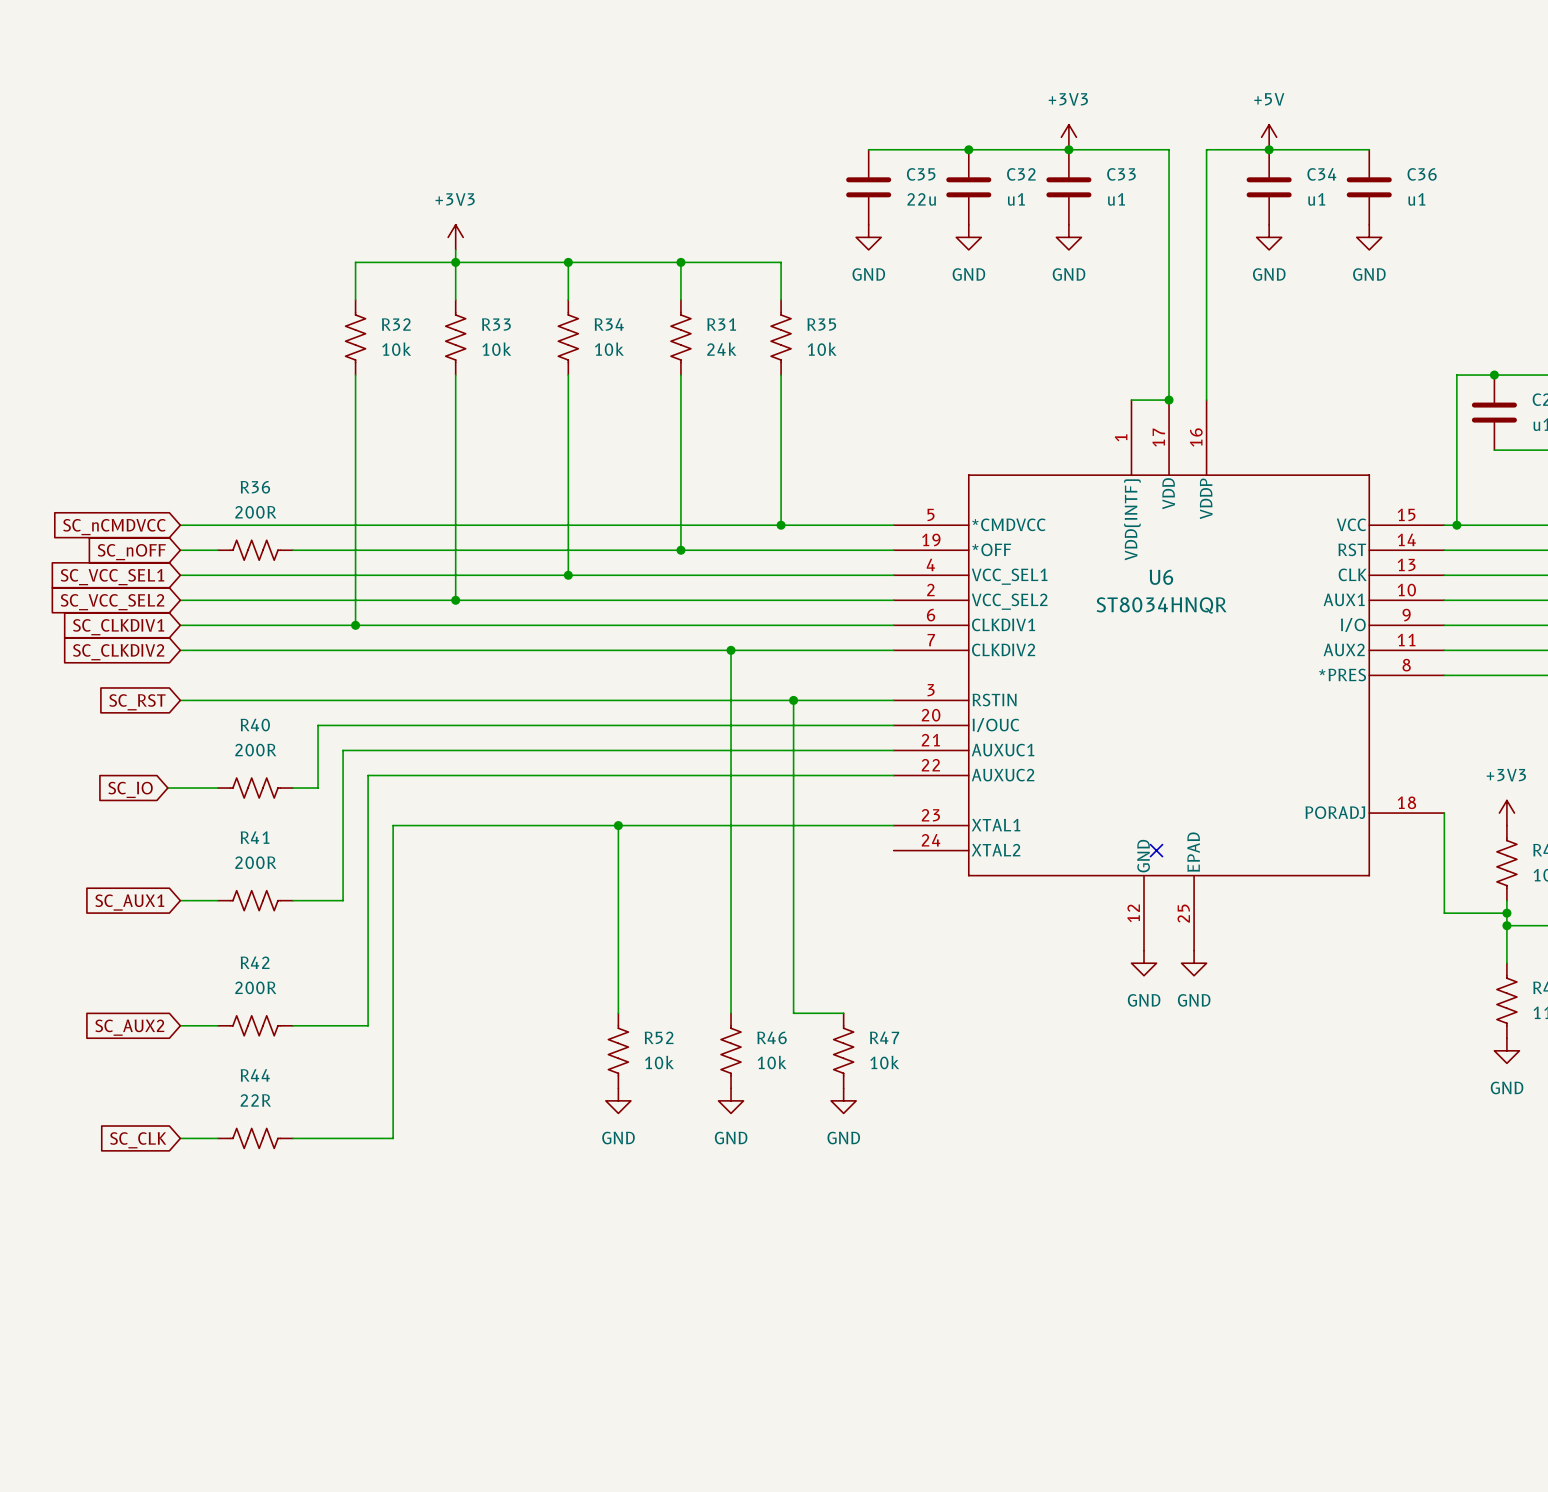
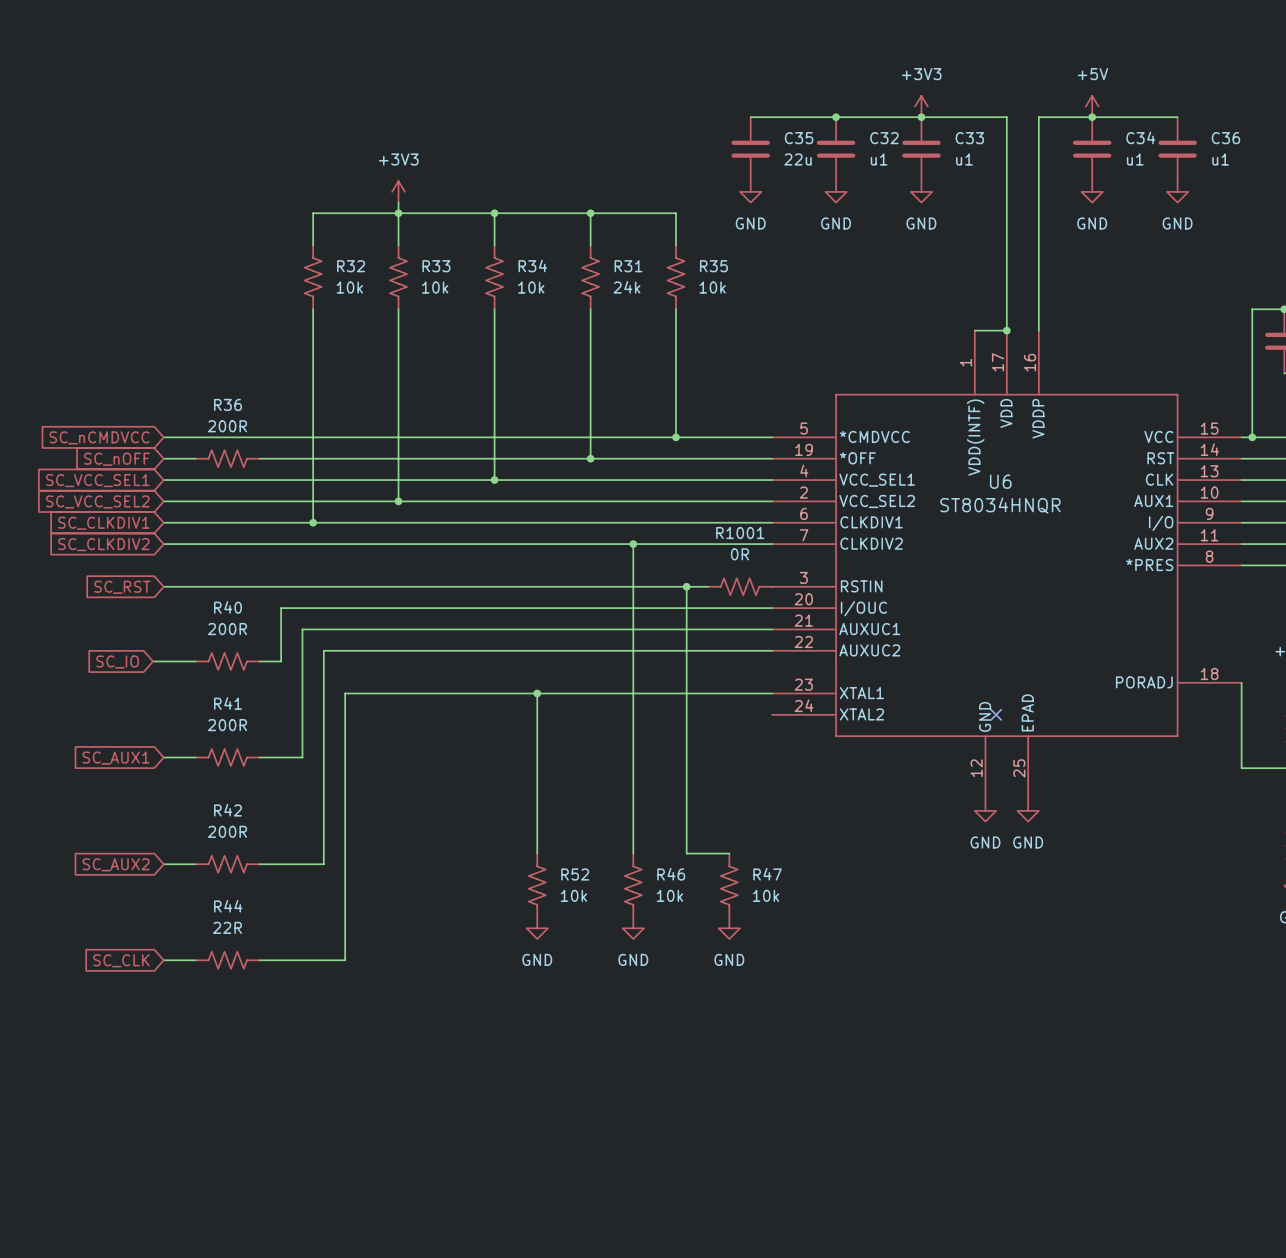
R1001: none -> 0R (740, 586)

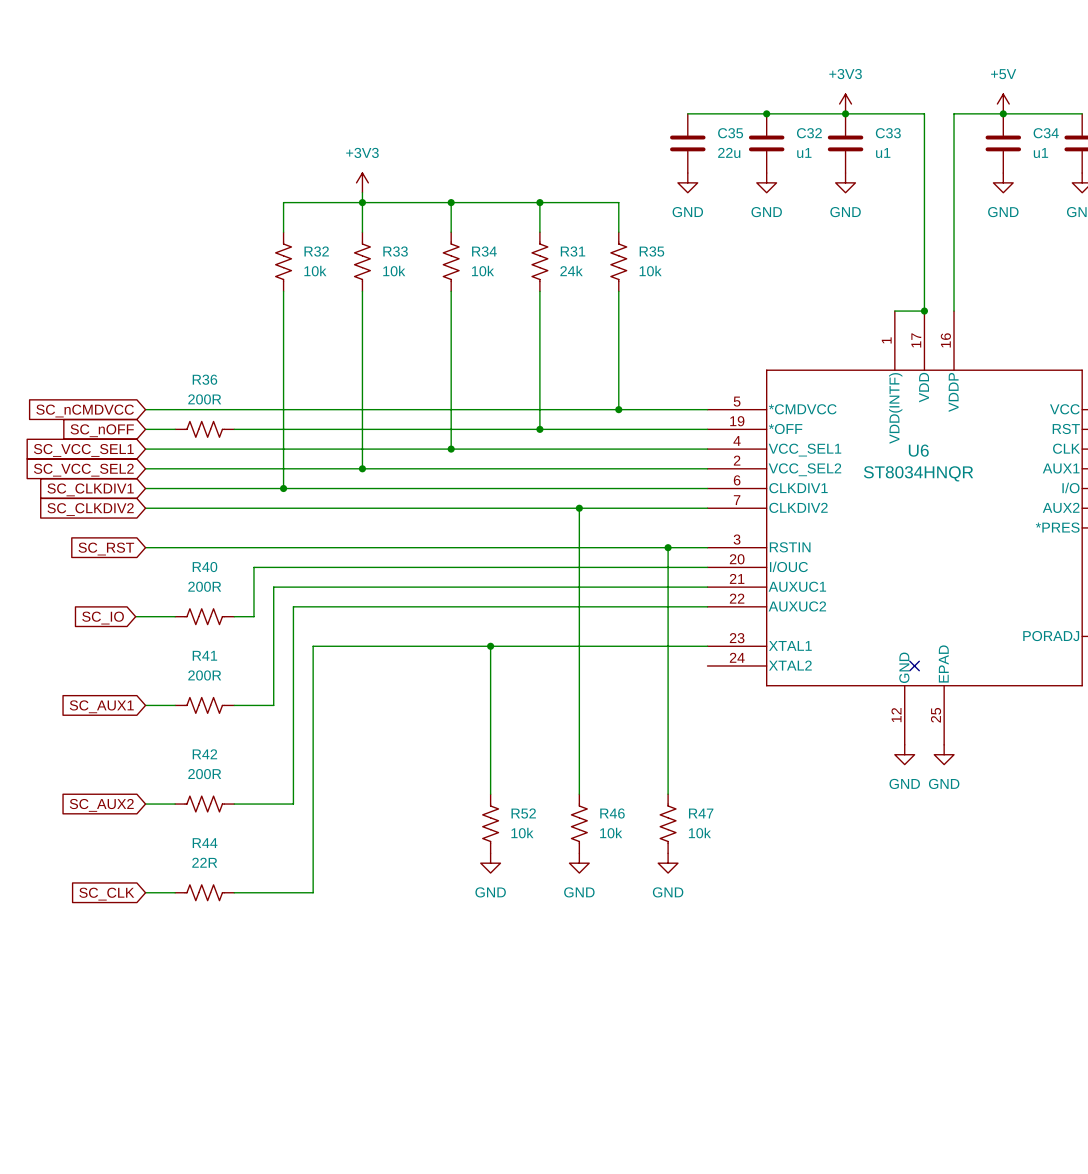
wire: (686, 586) (686, 853) (729, 853) -> (668, 547) (668, 794)
junction position: (686, 586) -> (668, 547)
R1001: 0R (740, 586) -> none

